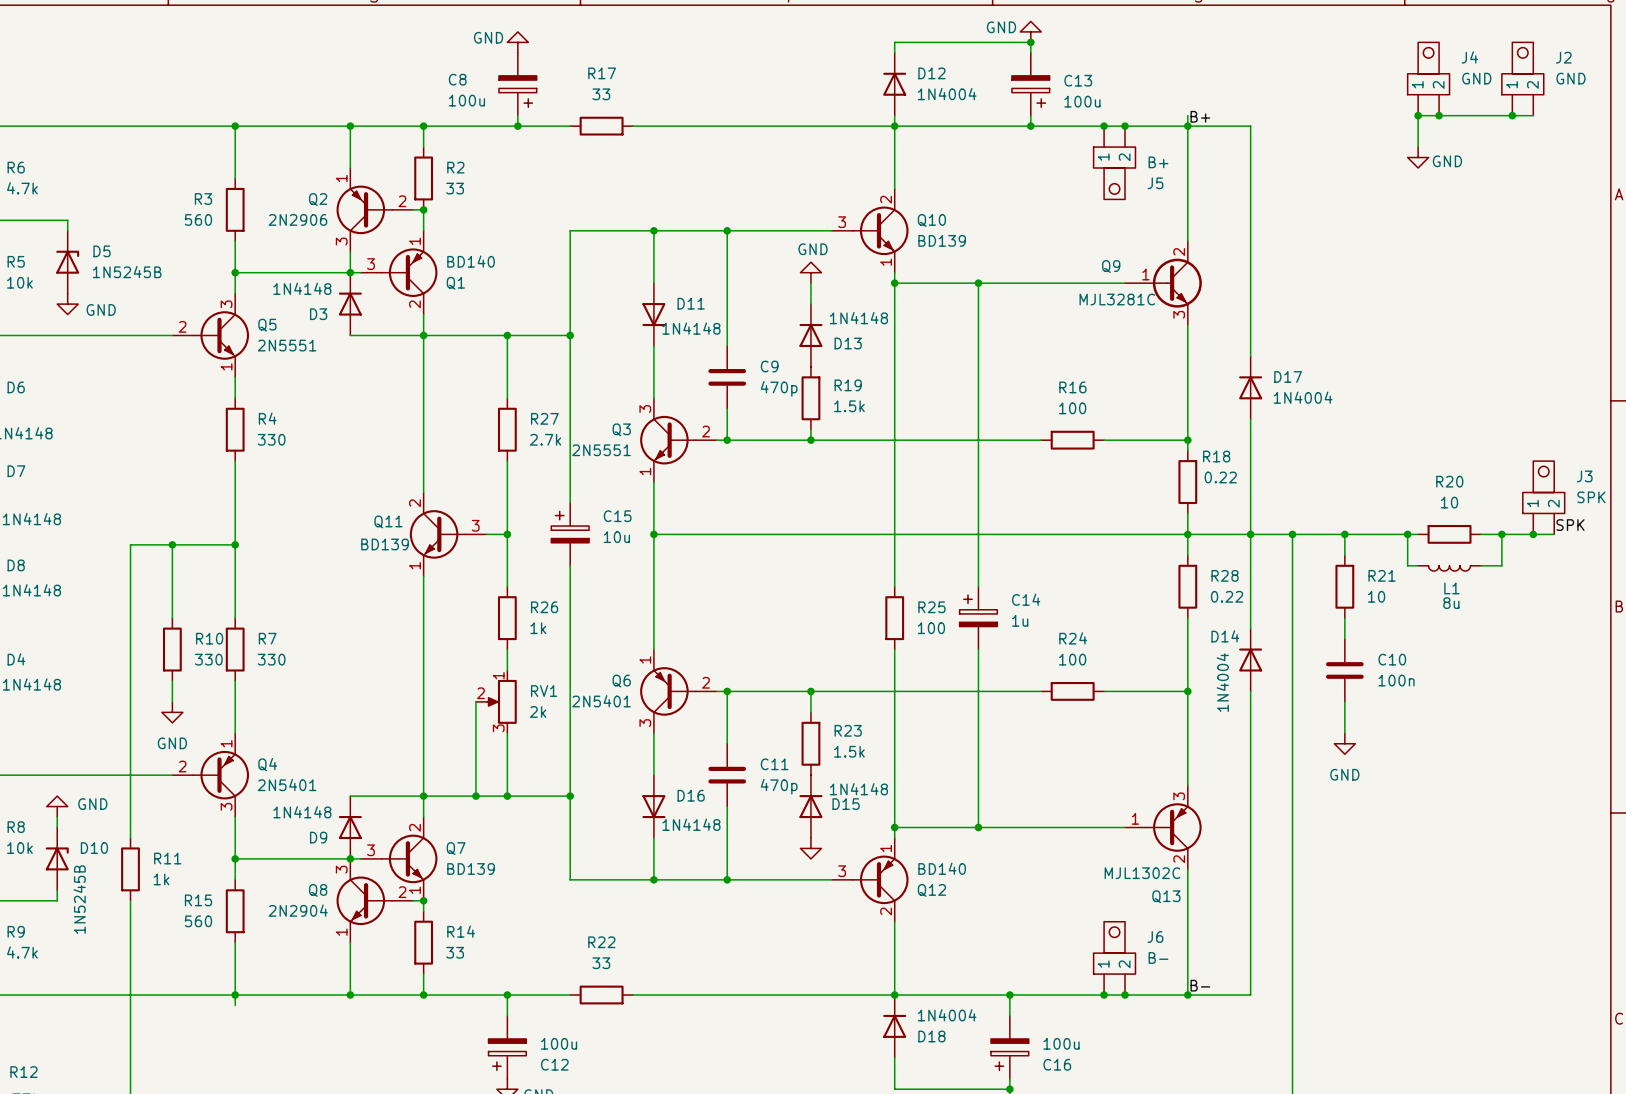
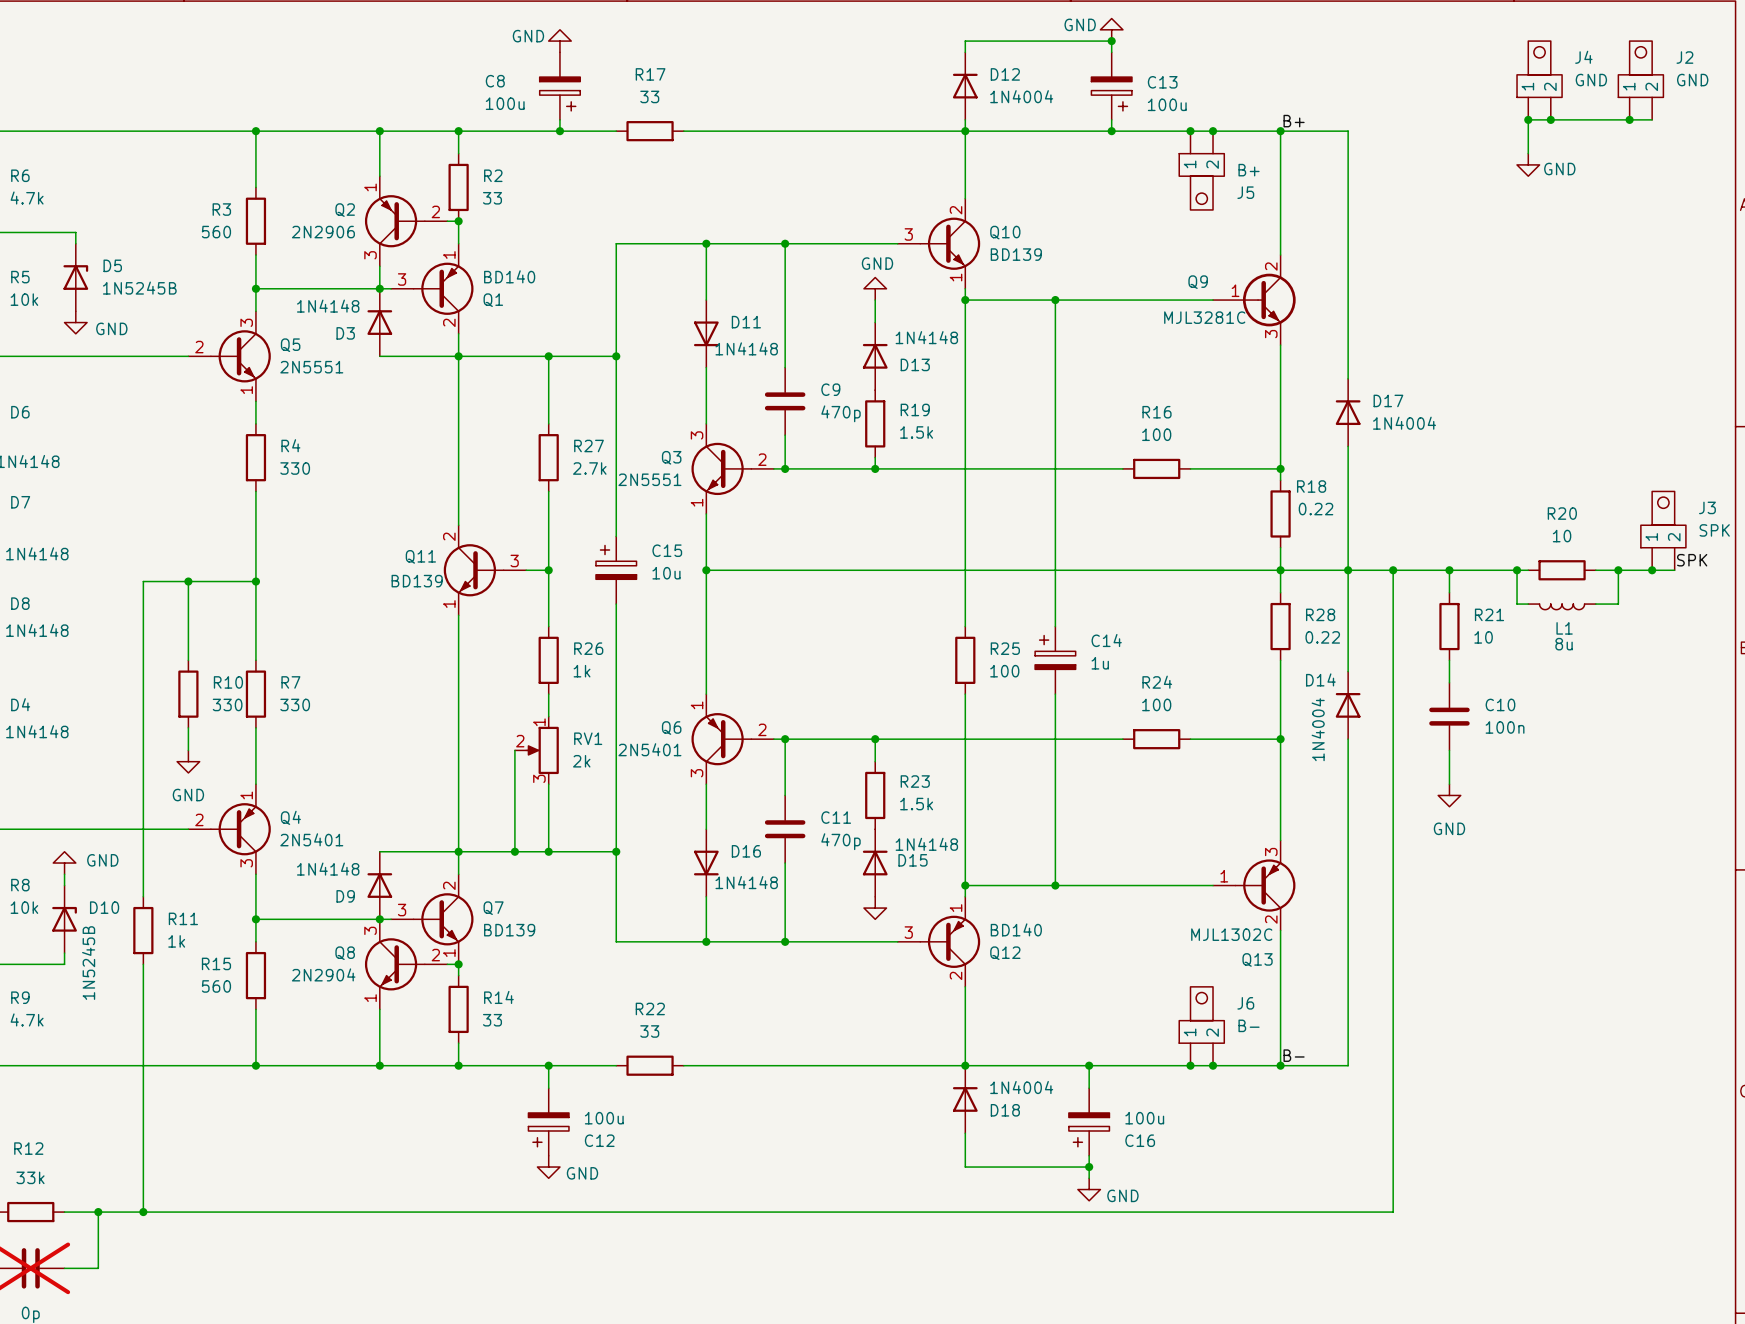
wire: (1187, 115) (1187, 126) -> none
wire: (235, 995) (235, 1005) -> none

